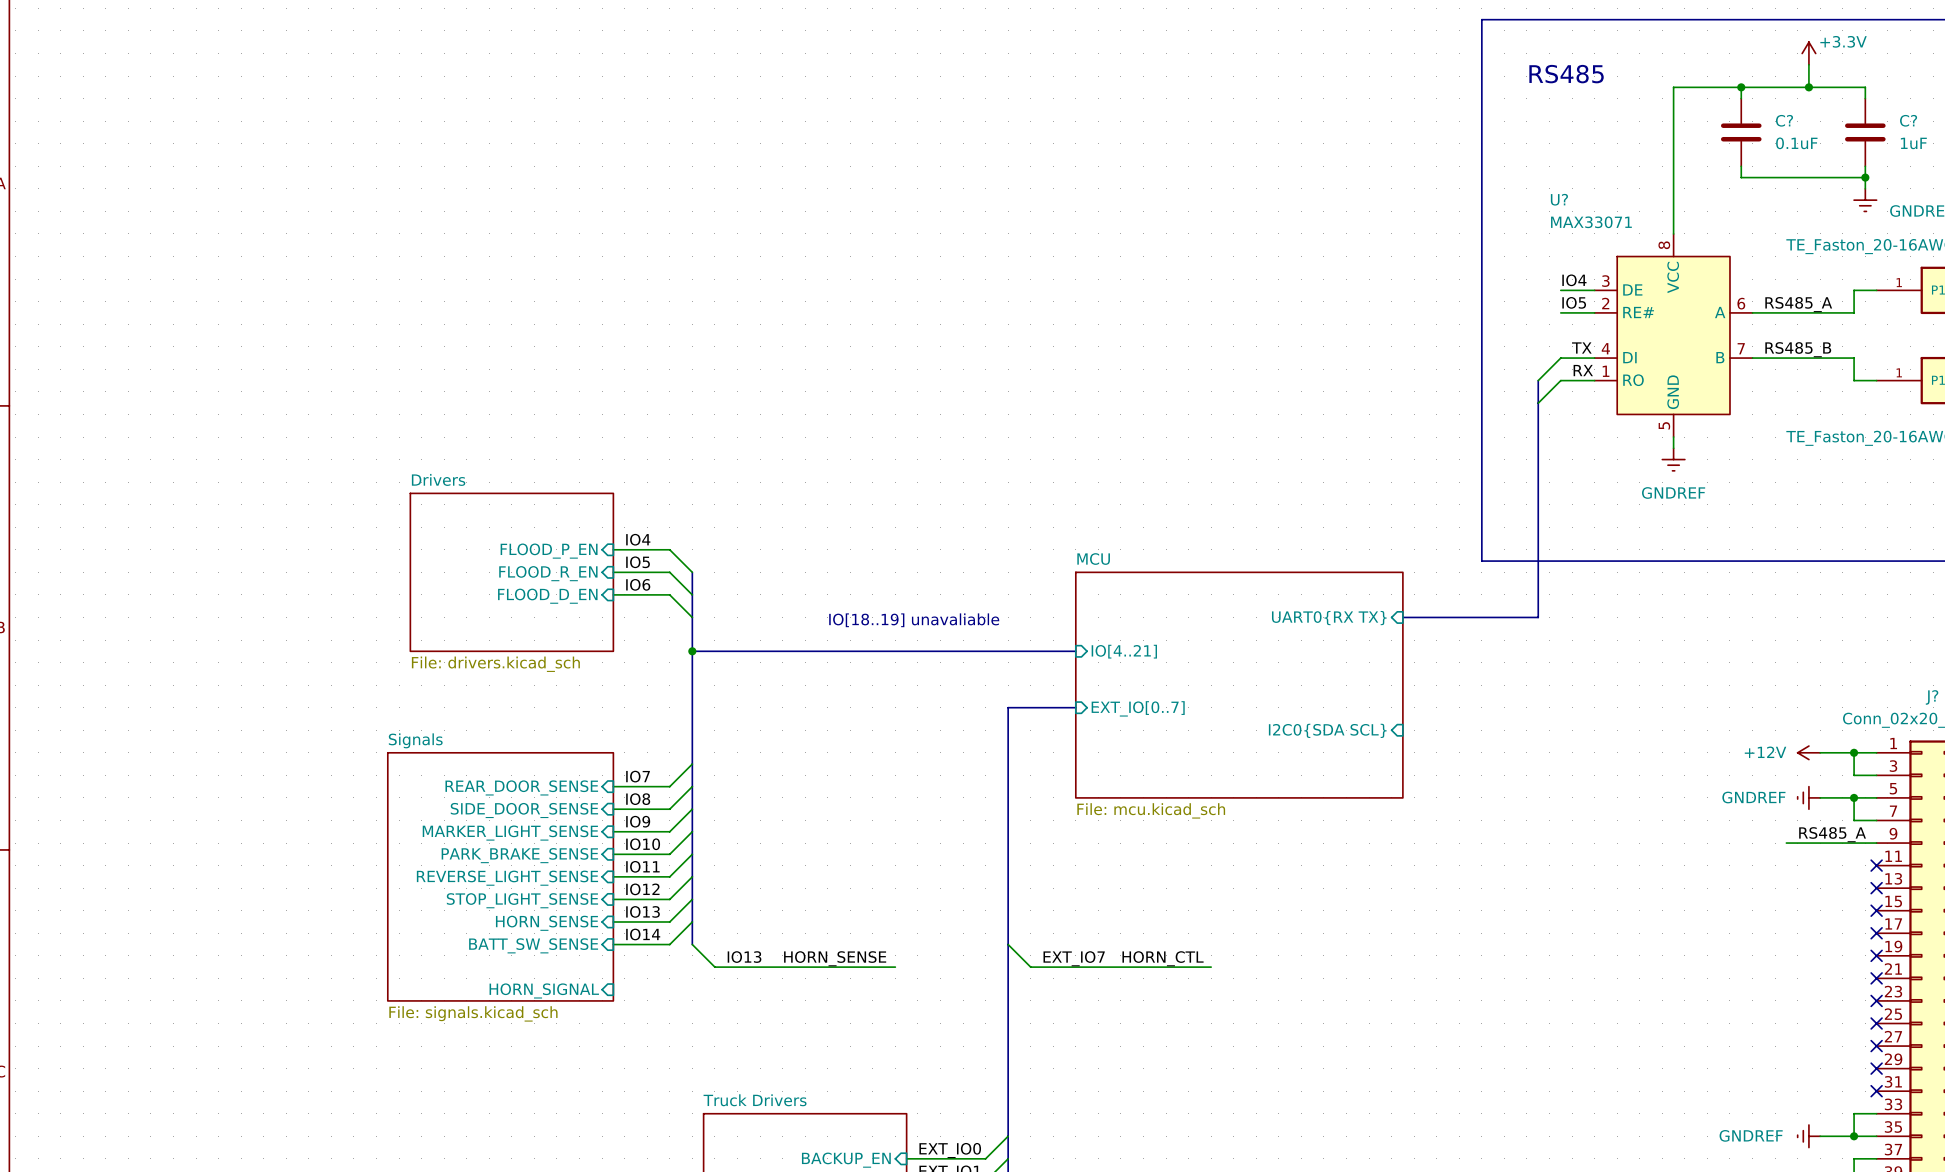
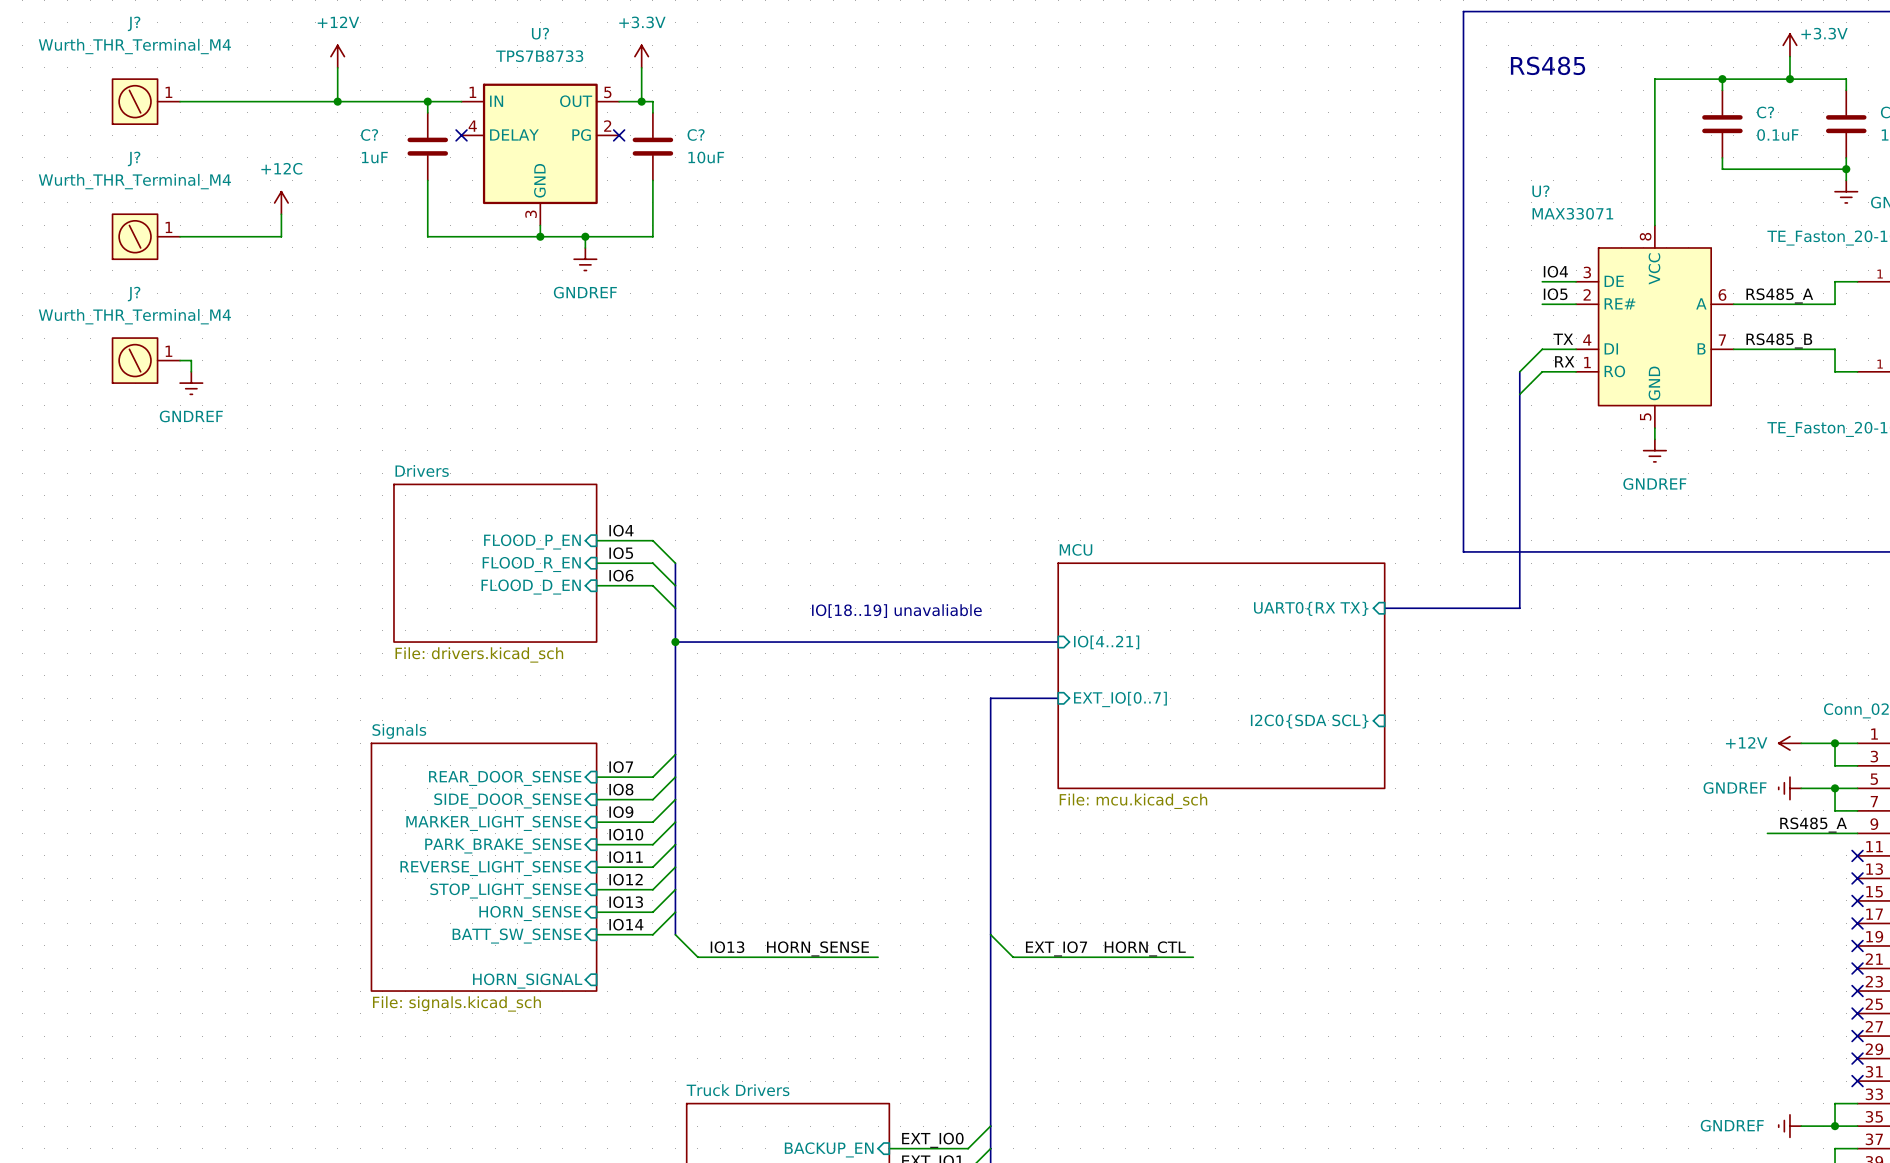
power symbol: none -> +12V (337, 56)
power symbol: none -> +3.3V (641, 56)
wire: none -> (337, 67) (337, 101)
wire: none -> (641, 67) (641, 101)
J?: none -> Wurth_THR_Terminal_M4 (146, 101)
wire: none -> (180, 101) (461, 101)
junction: none -> (337, 101)
wire: none -> (427, 101) (427, 112)
junction: none -> (427, 101)
wire: none -> (619, 101) (652, 101) (652, 112)
junction: none -> (641, 101)
no-connect mark: none -> (461, 135)
no-connect mark: none -> (619, 135)
C?: none -> 1uF (427, 146)
C?: none -> 10uF (652, 146)
U?: none -> TPS7B8733 (540, 154)
wire: none -> (427, 180) (427, 236) (652, 236) (652, 180)
power symbol: none -> +12C (281, 202)
wire: none -> (281, 214) (281, 236) (180, 236)
wire: none -> (540, 225) (540, 236)
J?: none -> Wurth_THR_Terminal_M4 (146, 236)
junction: none -> (540, 236)
wire: none -> (585, 236) (585, 247)
junction: none -> (585, 236)
power symbol: none -> GNDREF (585, 259)
J?: none -> Wurth_THR_Terminal_M4 (146, 360)
wire: none -> (180, 360) (191, 360) (191, 371)
power symbol: none -> GNDREF (191, 383)

